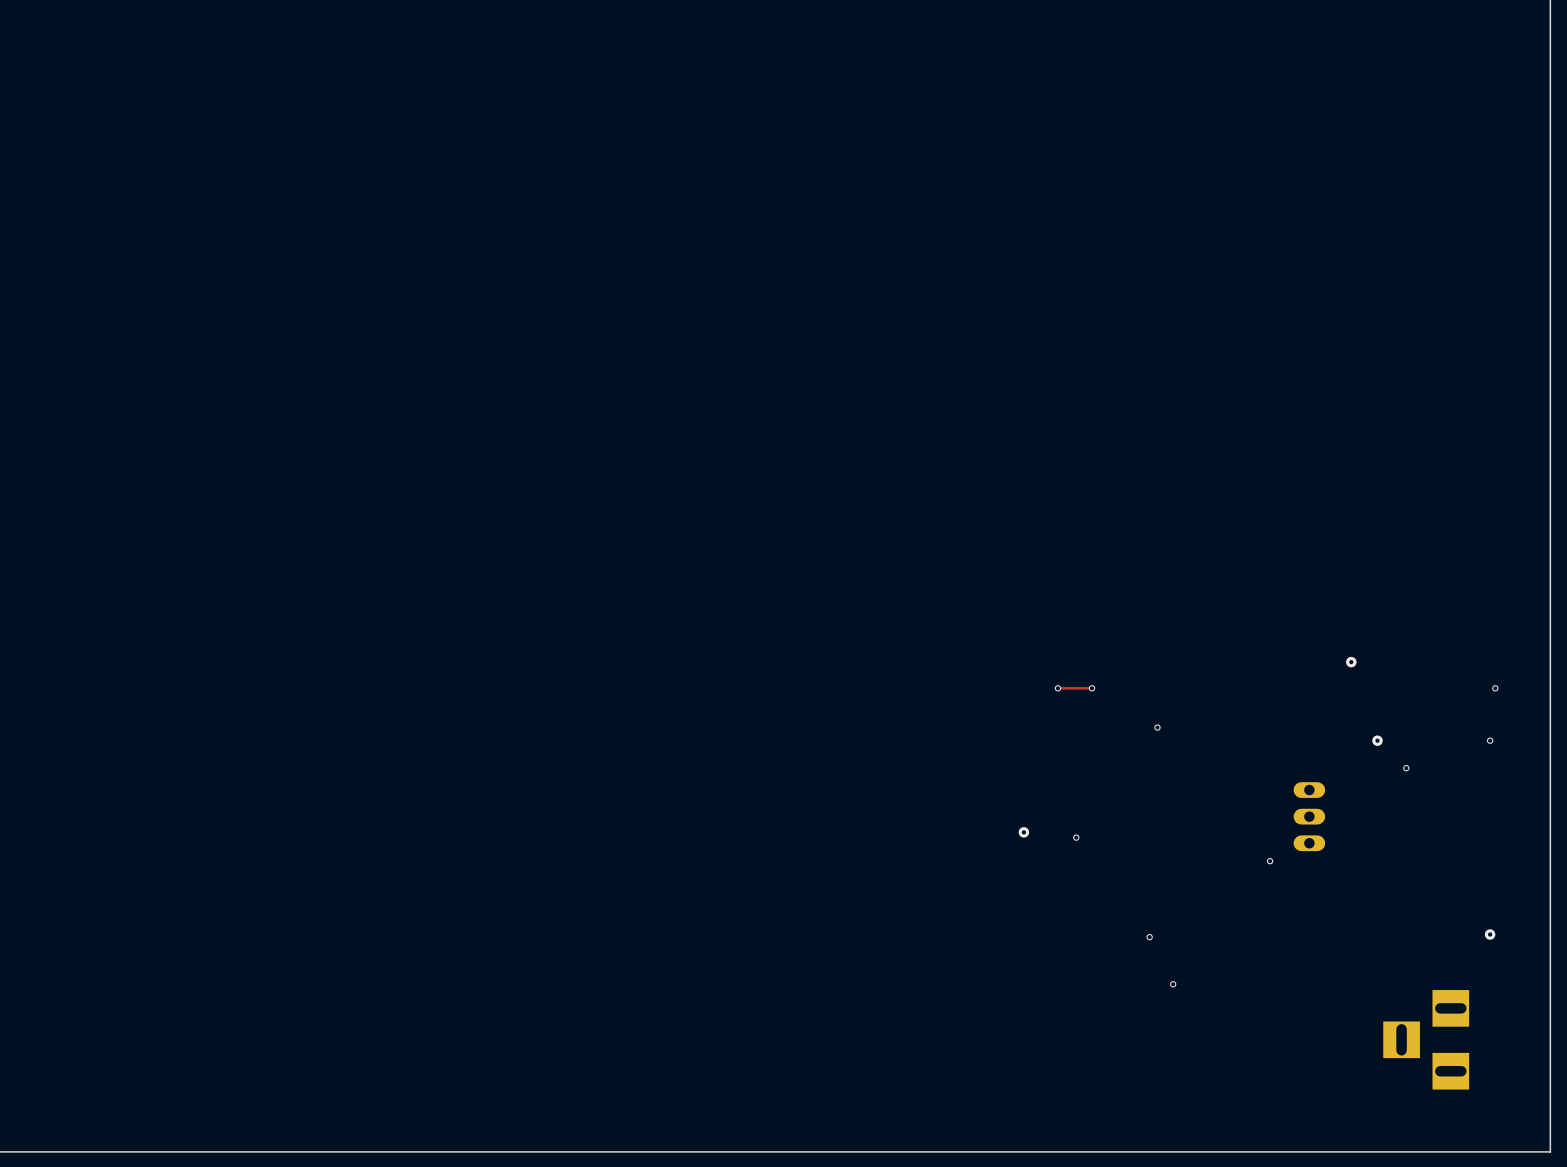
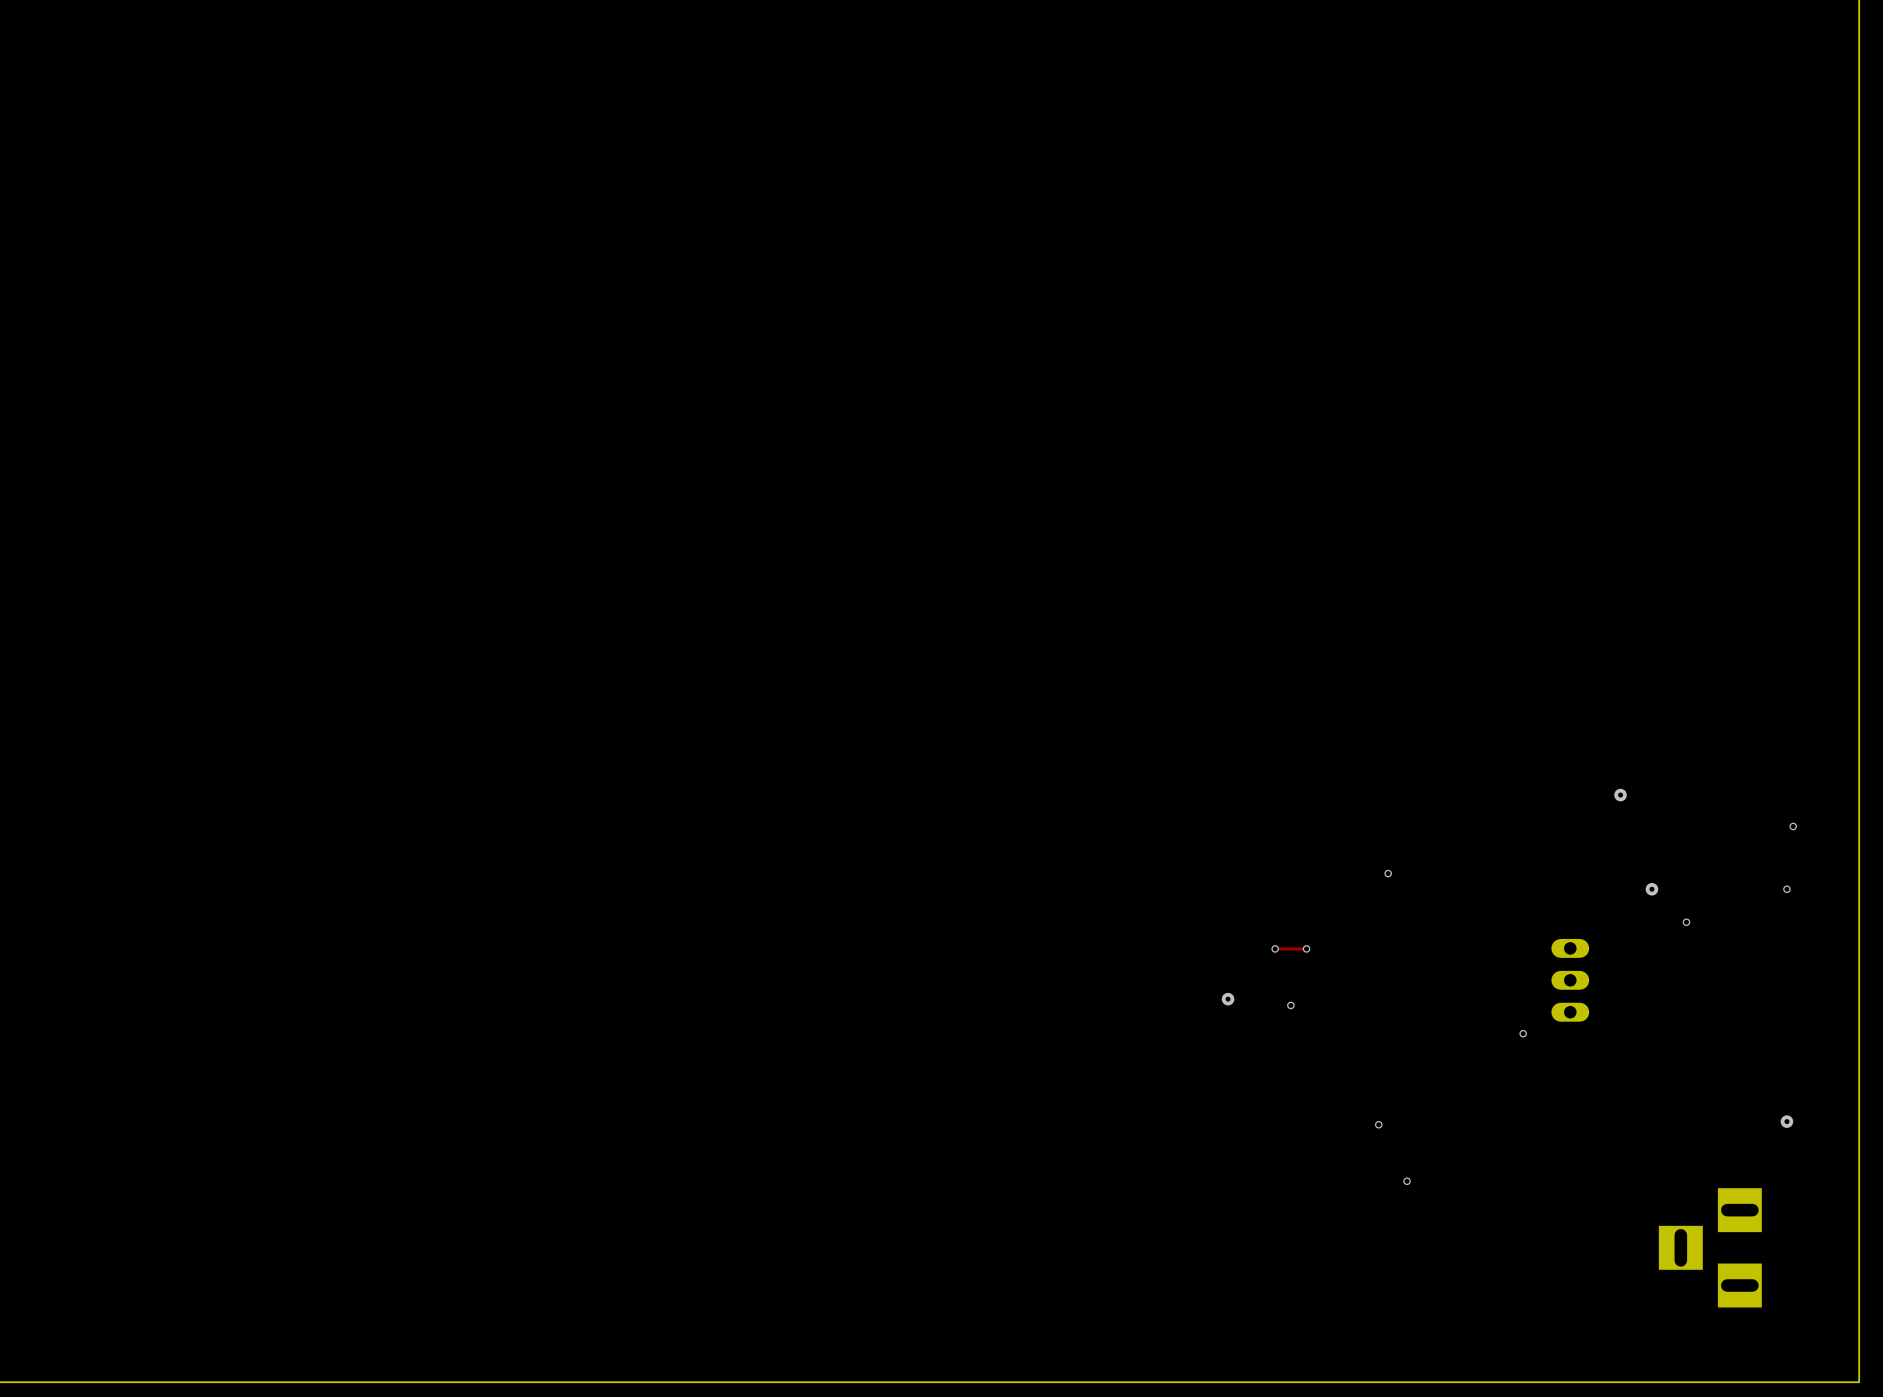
track: (1057, 688) (1092, 688) -> none
via: (1057, 688) -> none
via: (1092, 688) -> none
track: none -> (1275, 948) (1306, 948)
via: none -> (1275, 948)
via: none -> (1306, 948)

